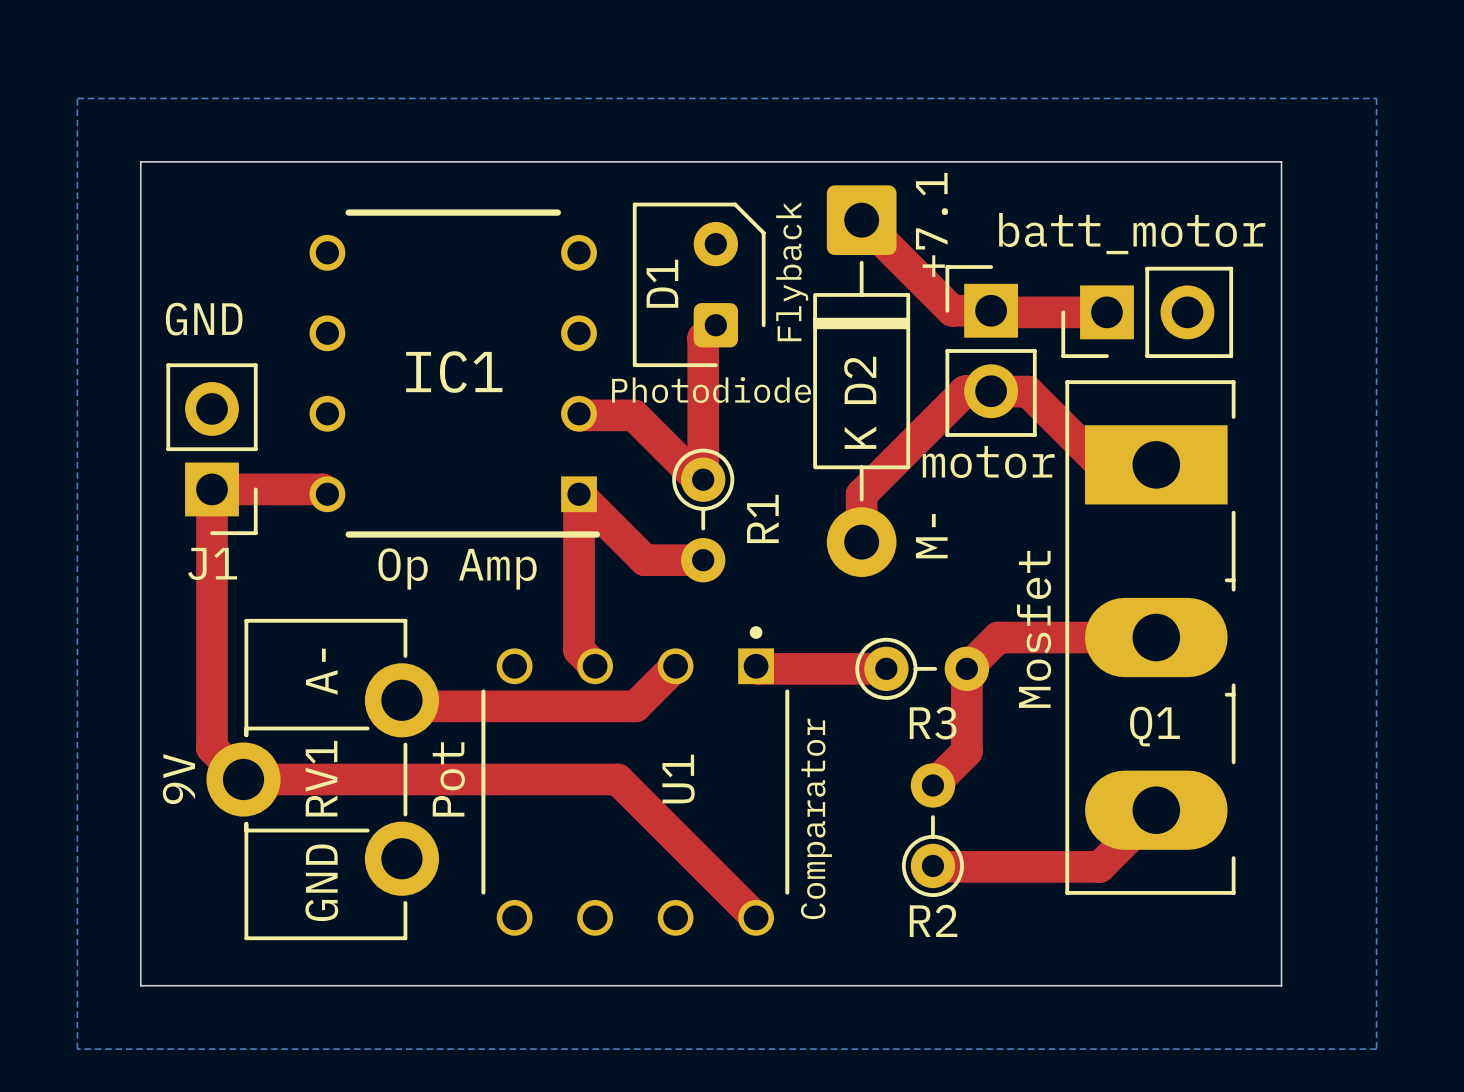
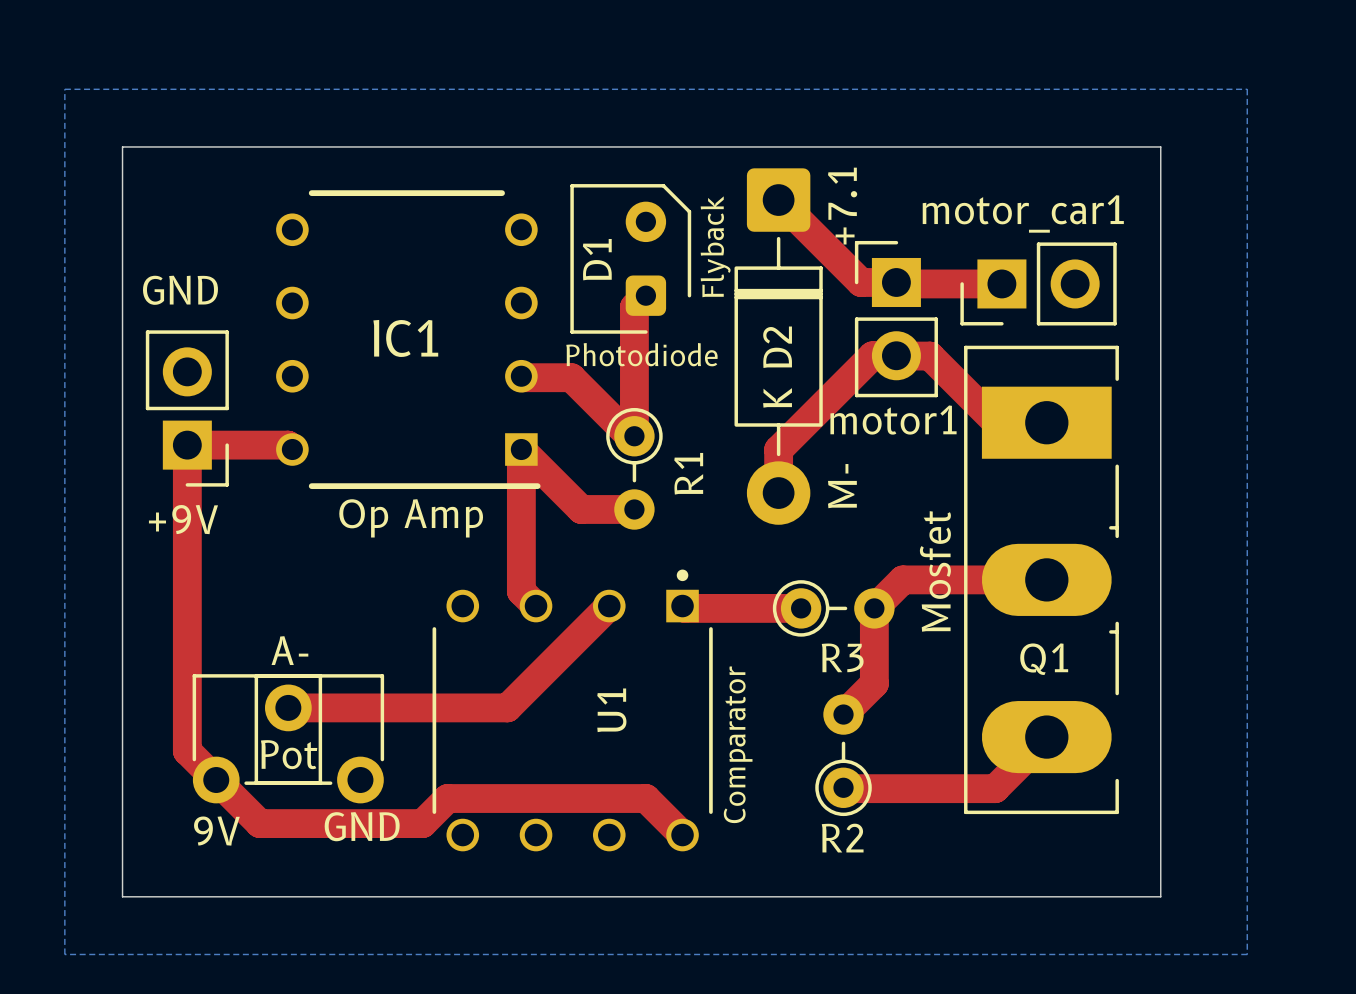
batt_motor name: batt_motor (1132, 233) -> motor_car1 (1023, 213)
motor name: motor (988, 461) -> motor1 (893, 420)
J1 name: J1 (212, 563) -> +9V (183, 519)
text rotation: 0° (321, 671) -> 90° clockwise (289, 650)
top track: (401, 700) (408, 706) (635, 706) -> (288, 707) (507, 707) (572, 642)
top track: (212, 748) (243, 779) (617, 779) (715, 877) -> (187, 680) (187, 751) (259, 823) (422, 823) (447, 798) (646, 798)
text rotation: 0° (178, 779) -> 90° clockwise (216, 831)
text position: 9V (178, 779) -> 9V (216, 831)
RV1: (322, 779) -> none
text: Pot (448, 779) -> none
Pot: none -> (288, 738)
text rotation: 0° (321, 882) -> 90° clockwise (362, 826)

